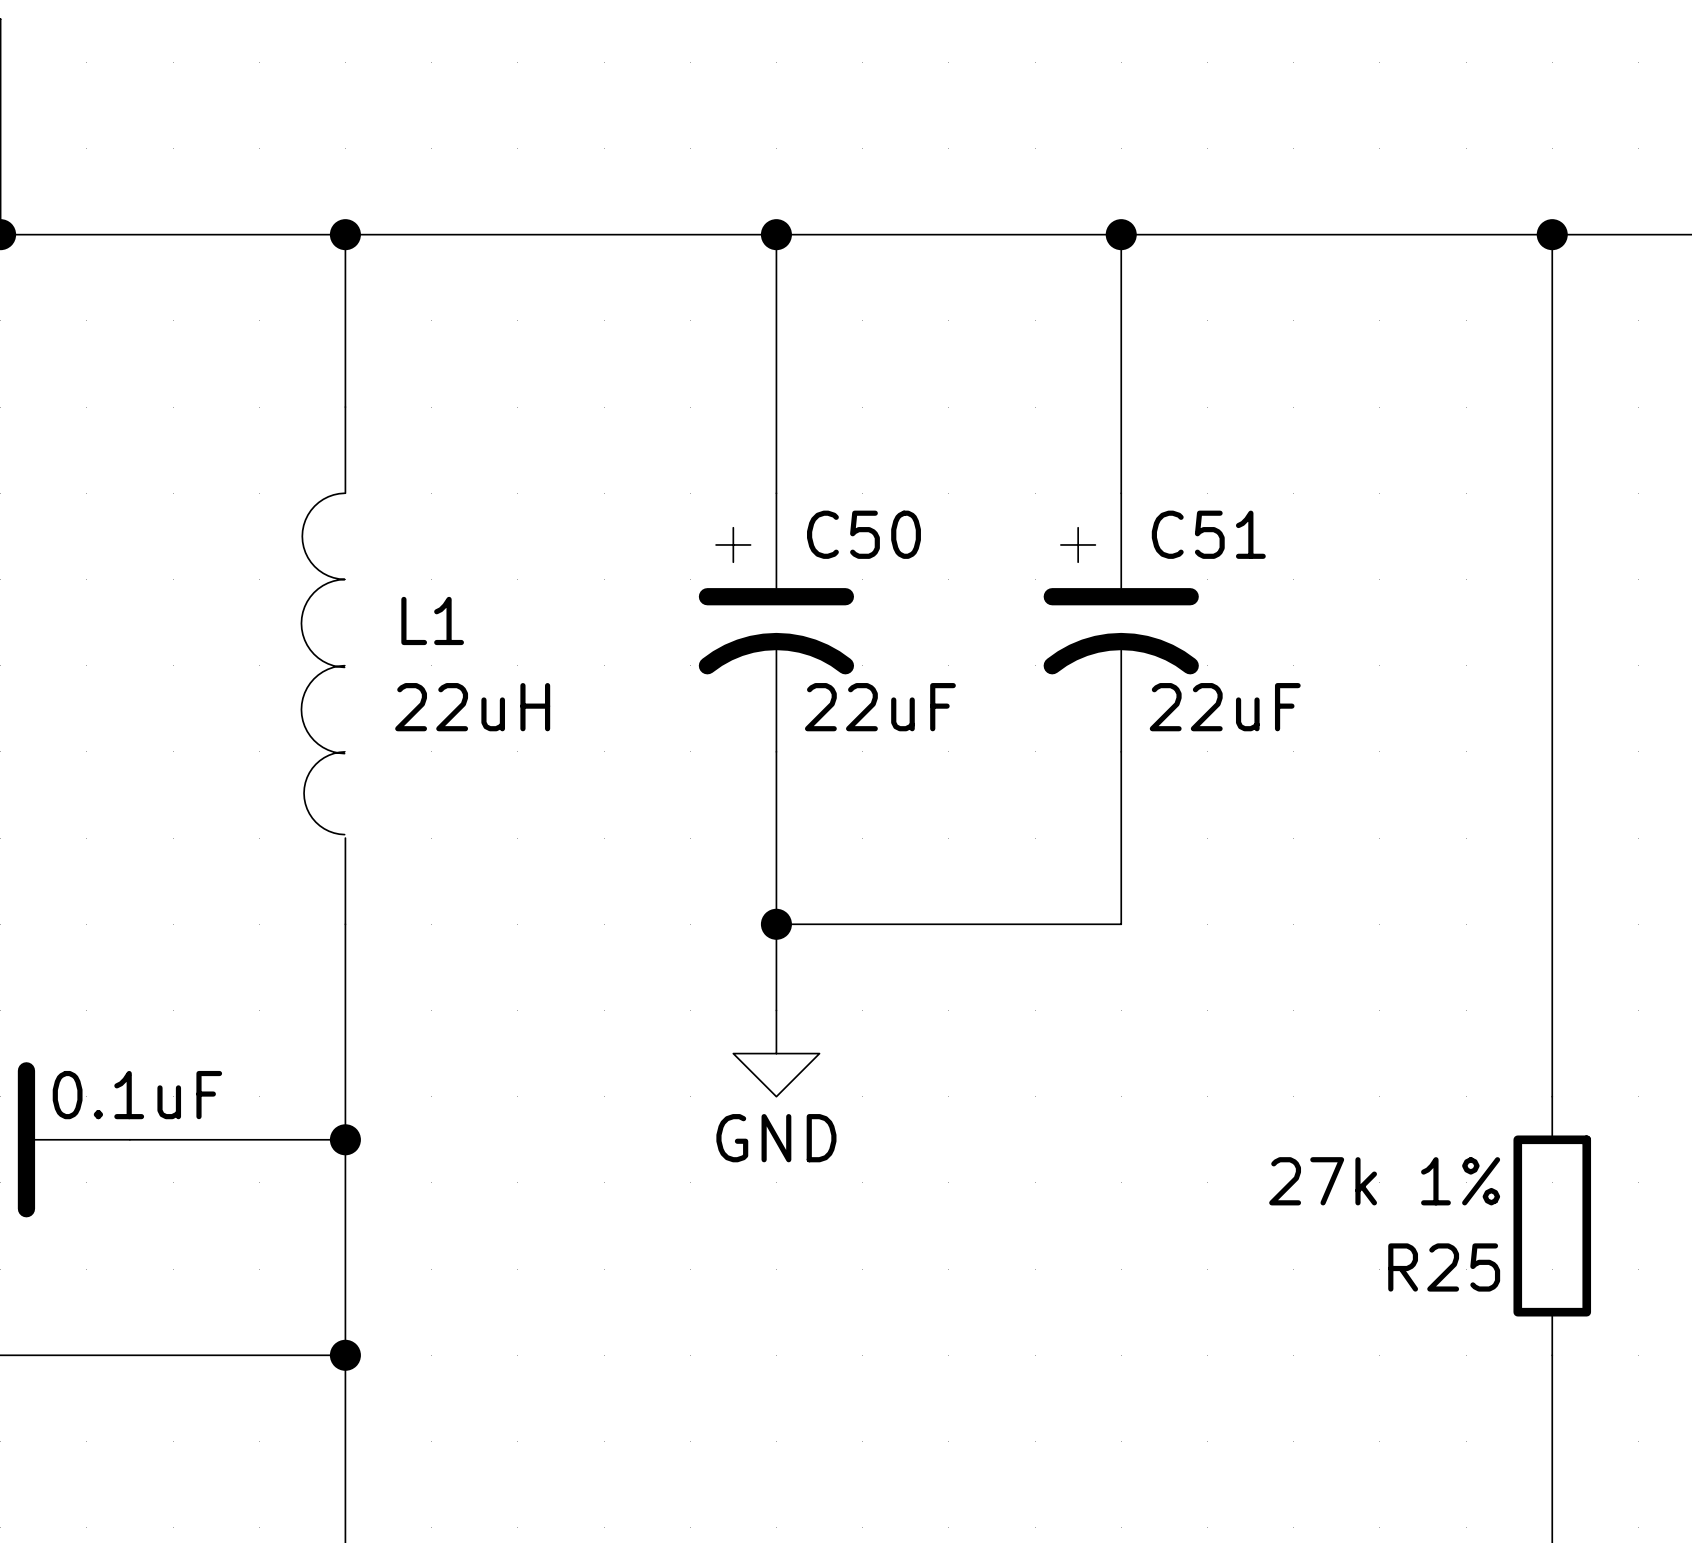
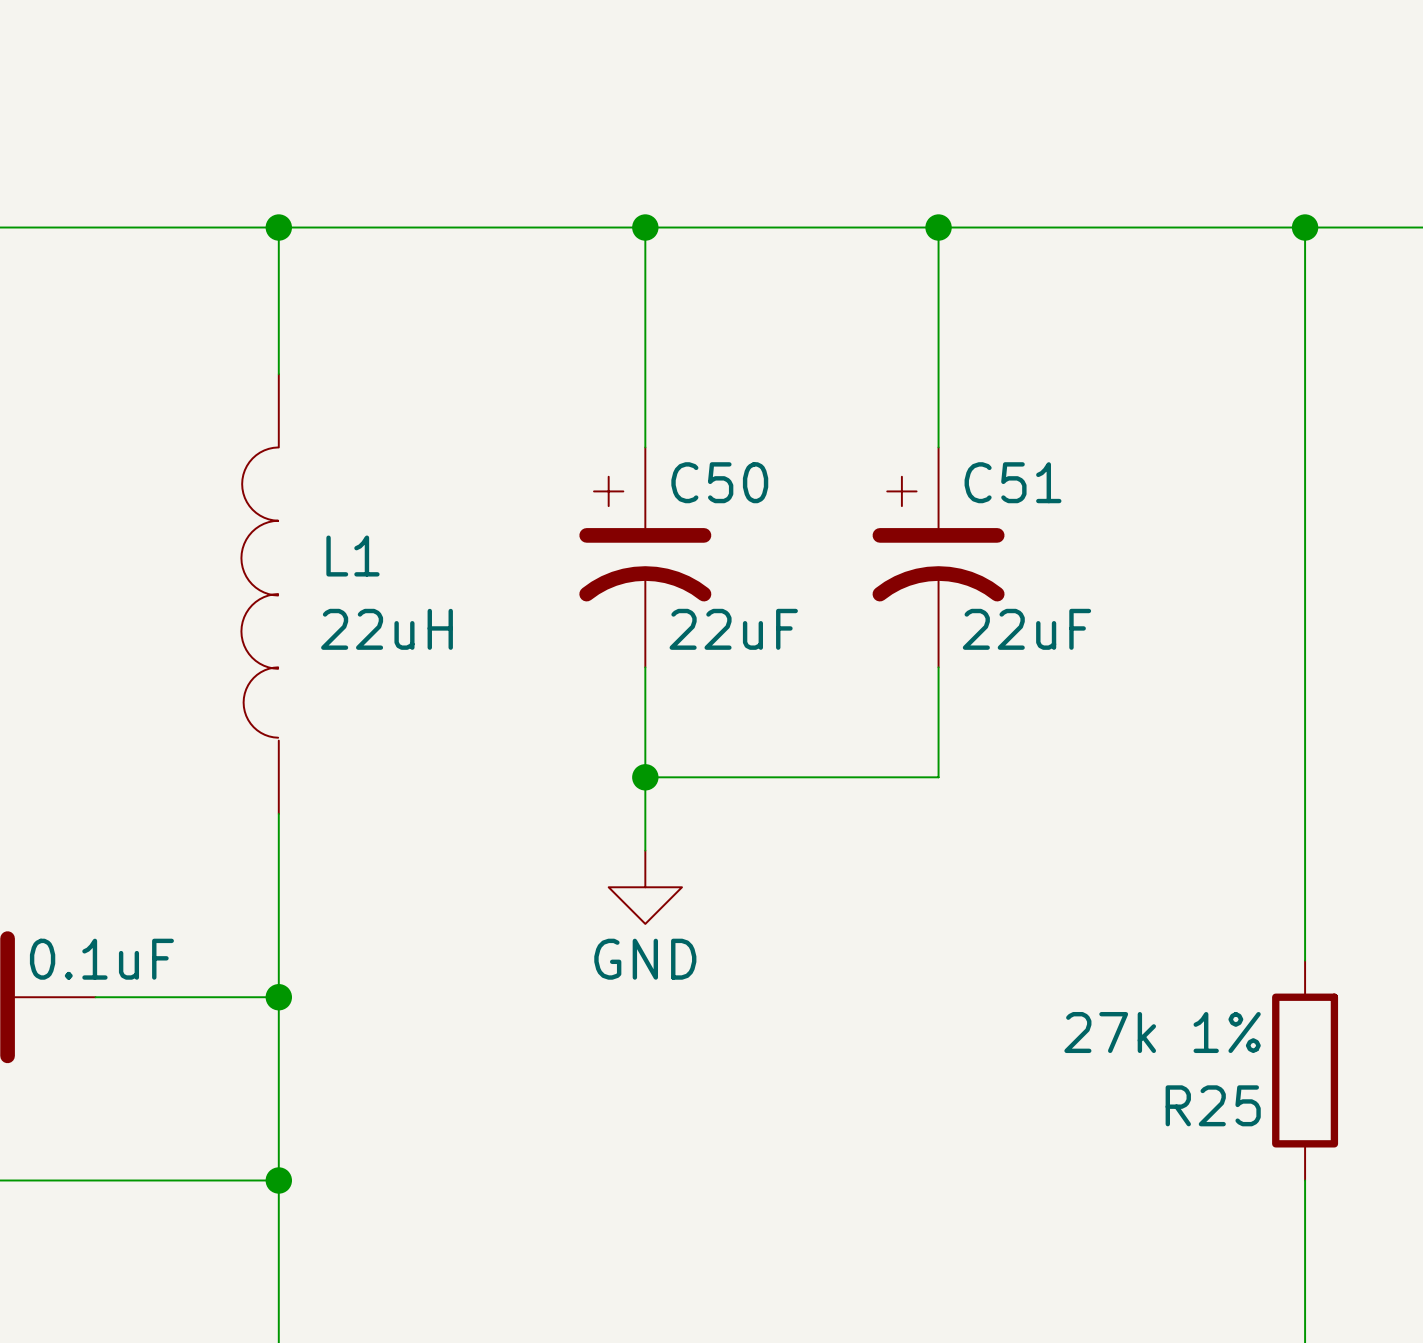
wire: (1121, 881) (1121, 924) (776, 924) -> (938, 777) (645, 777)
junction position: (776, 924) -> (645, 777)
power symbol position: GND (776, 1053) -> GND (645, 887)

